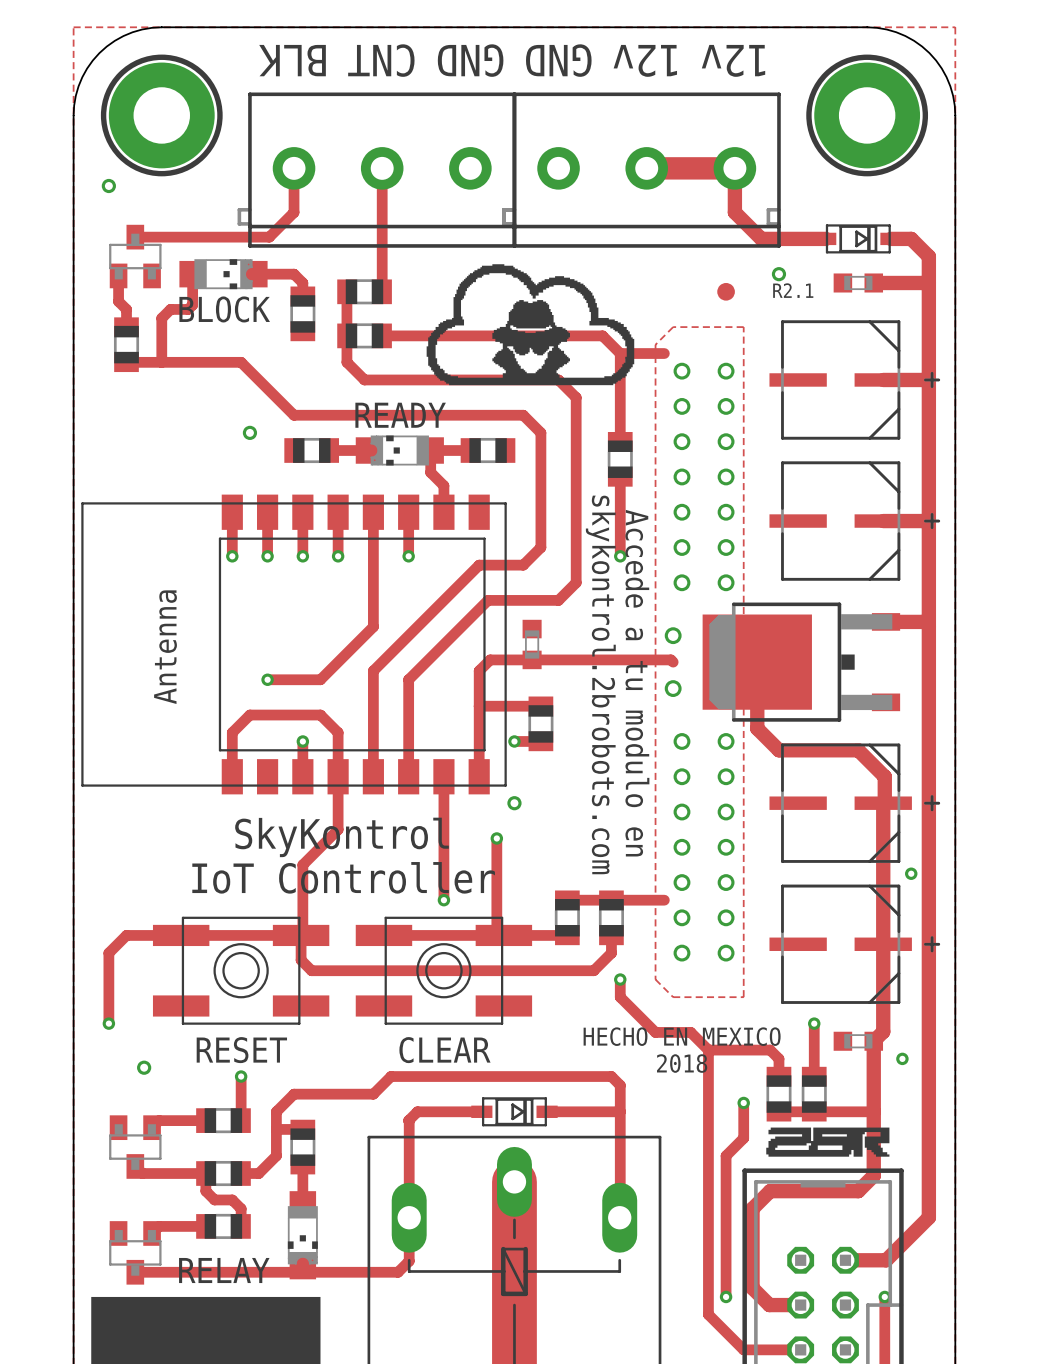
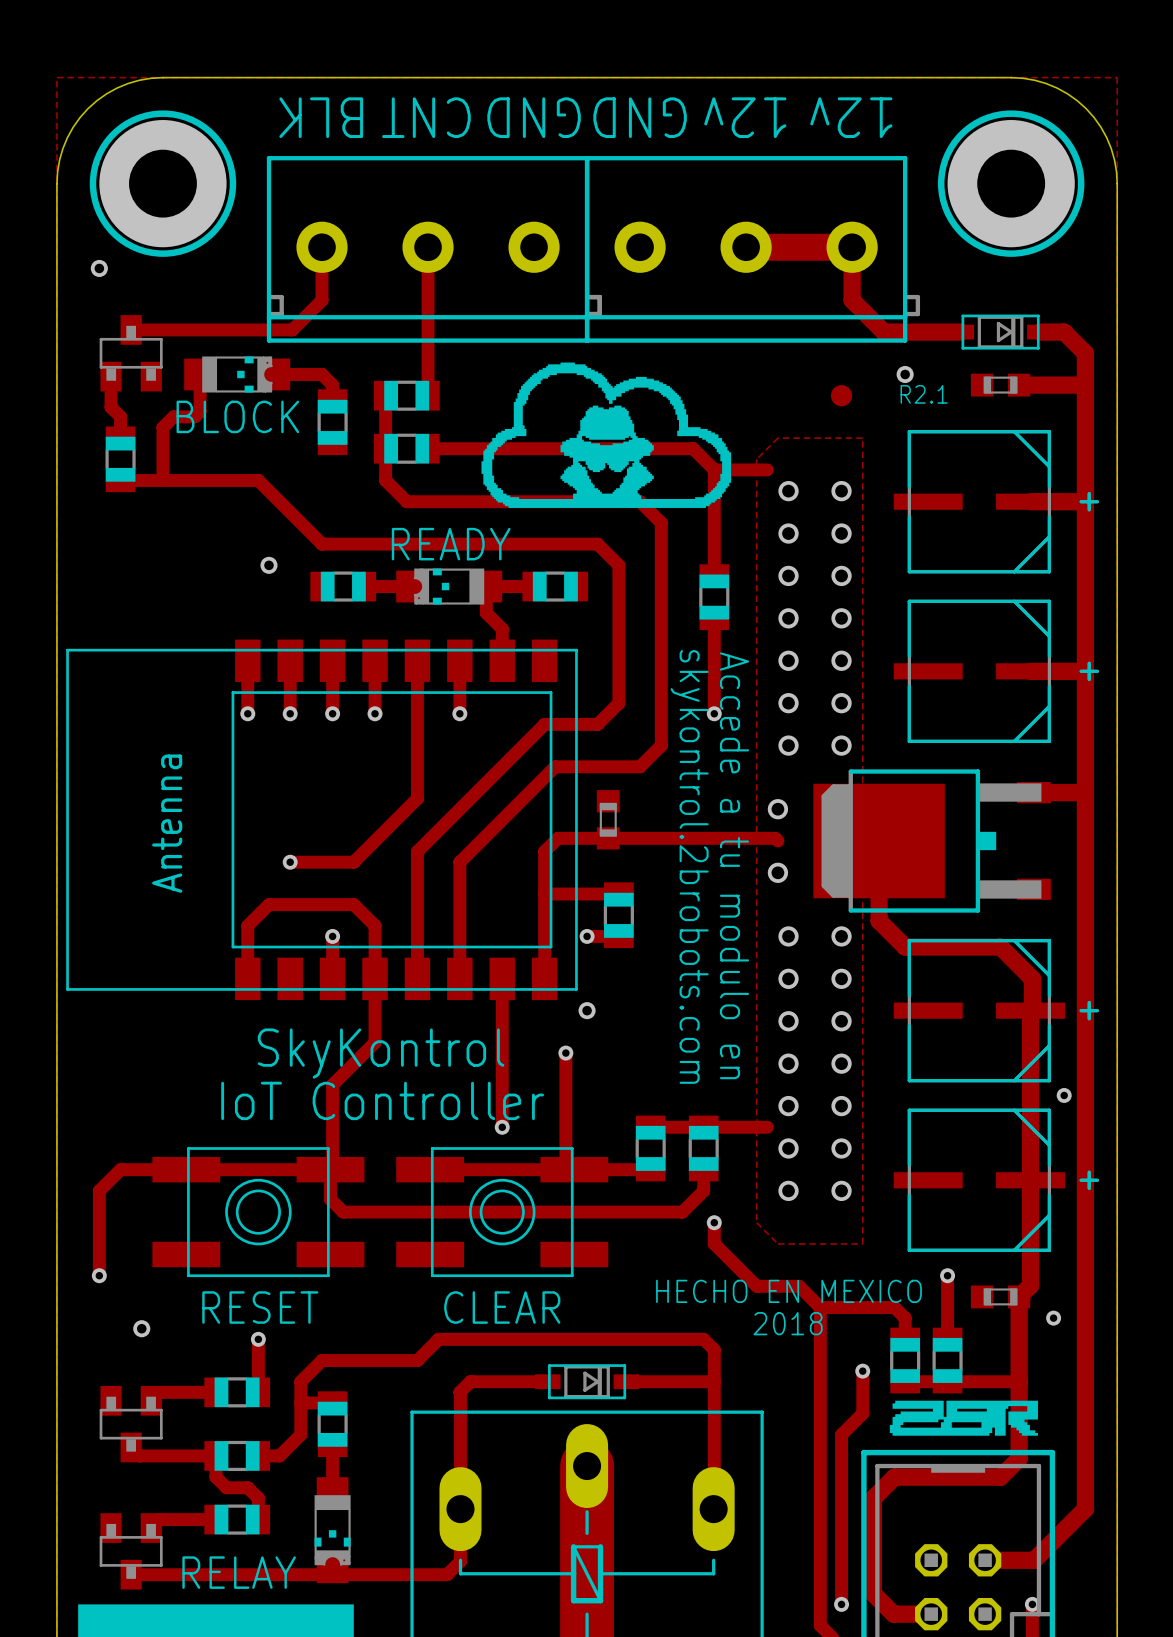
part footprint: [237, 92, 517, 248] -> [266, 156, 602, 343]
part footprint: [502, 92, 781, 248] -> [584, 156, 921, 343]
part footprint: [815, 224, 902, 254] -> [948, 314, 1053, 350]
part footprint: [471, 1097, 558, 1127] -> [535, 1364, 640, 1400]

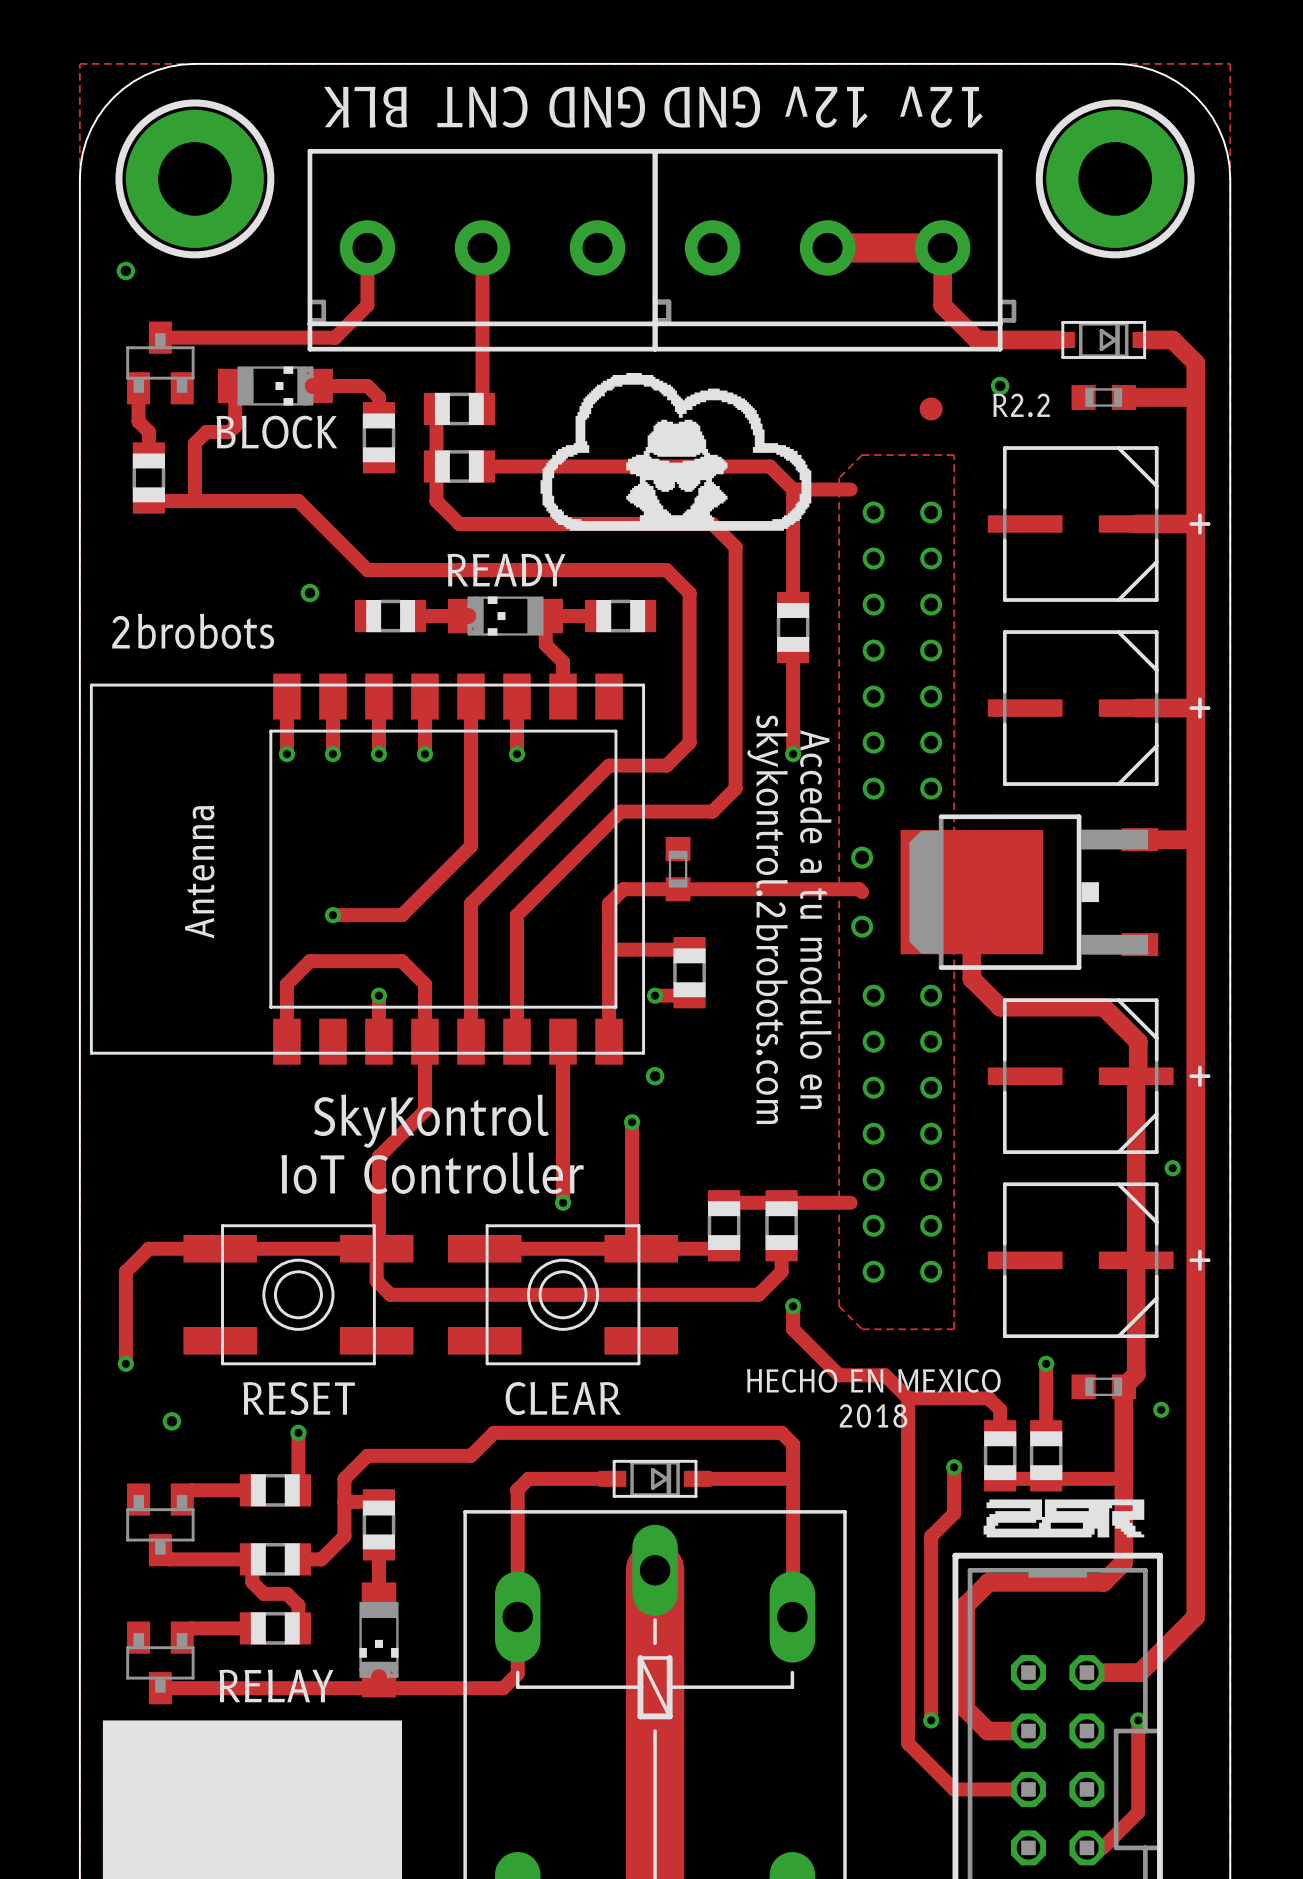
text: R2.1 (924, 394) -> R2.2 (1021, 405)
text: none -> 2brobots (193, 631)

